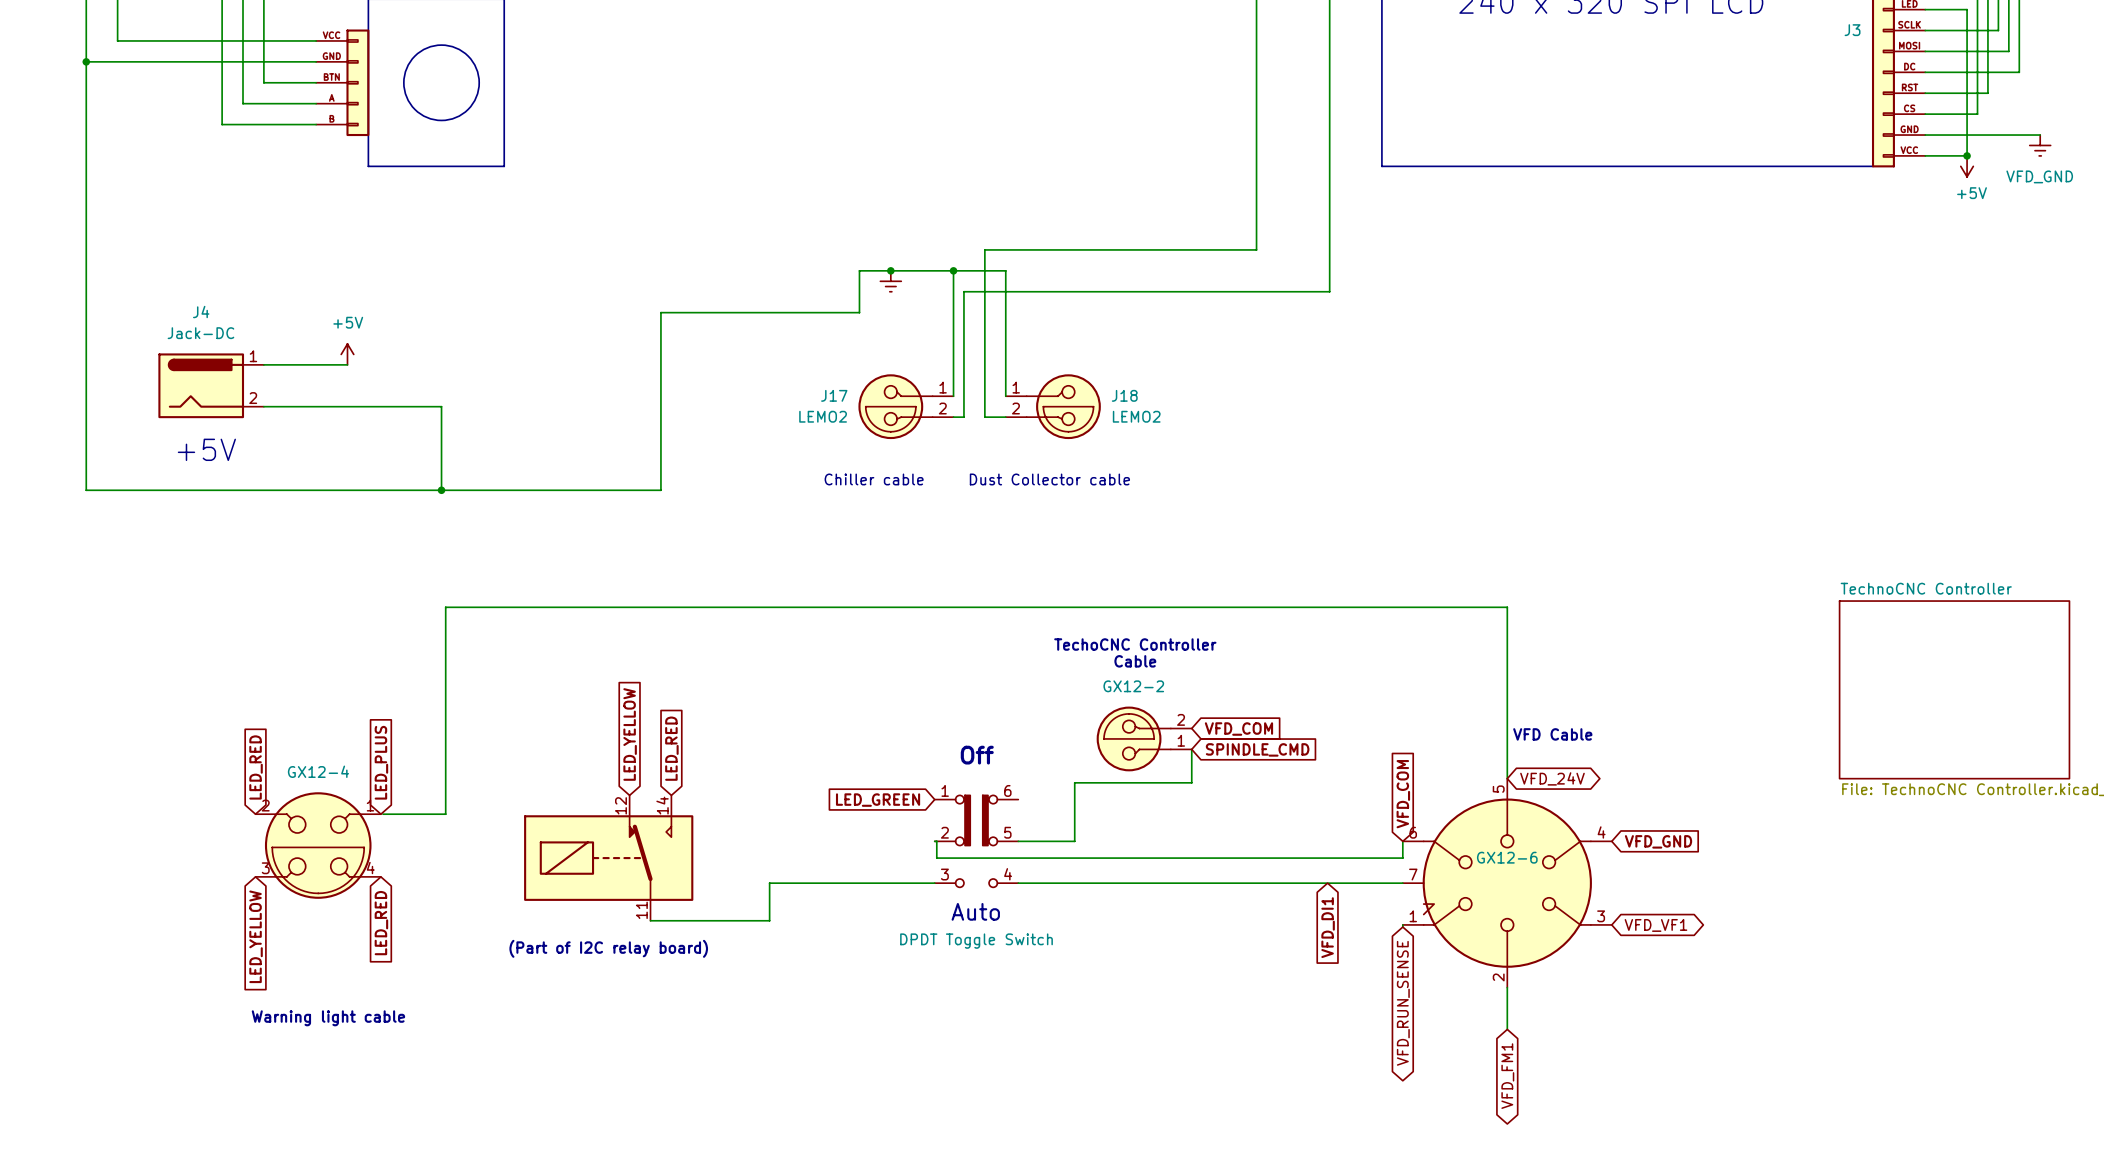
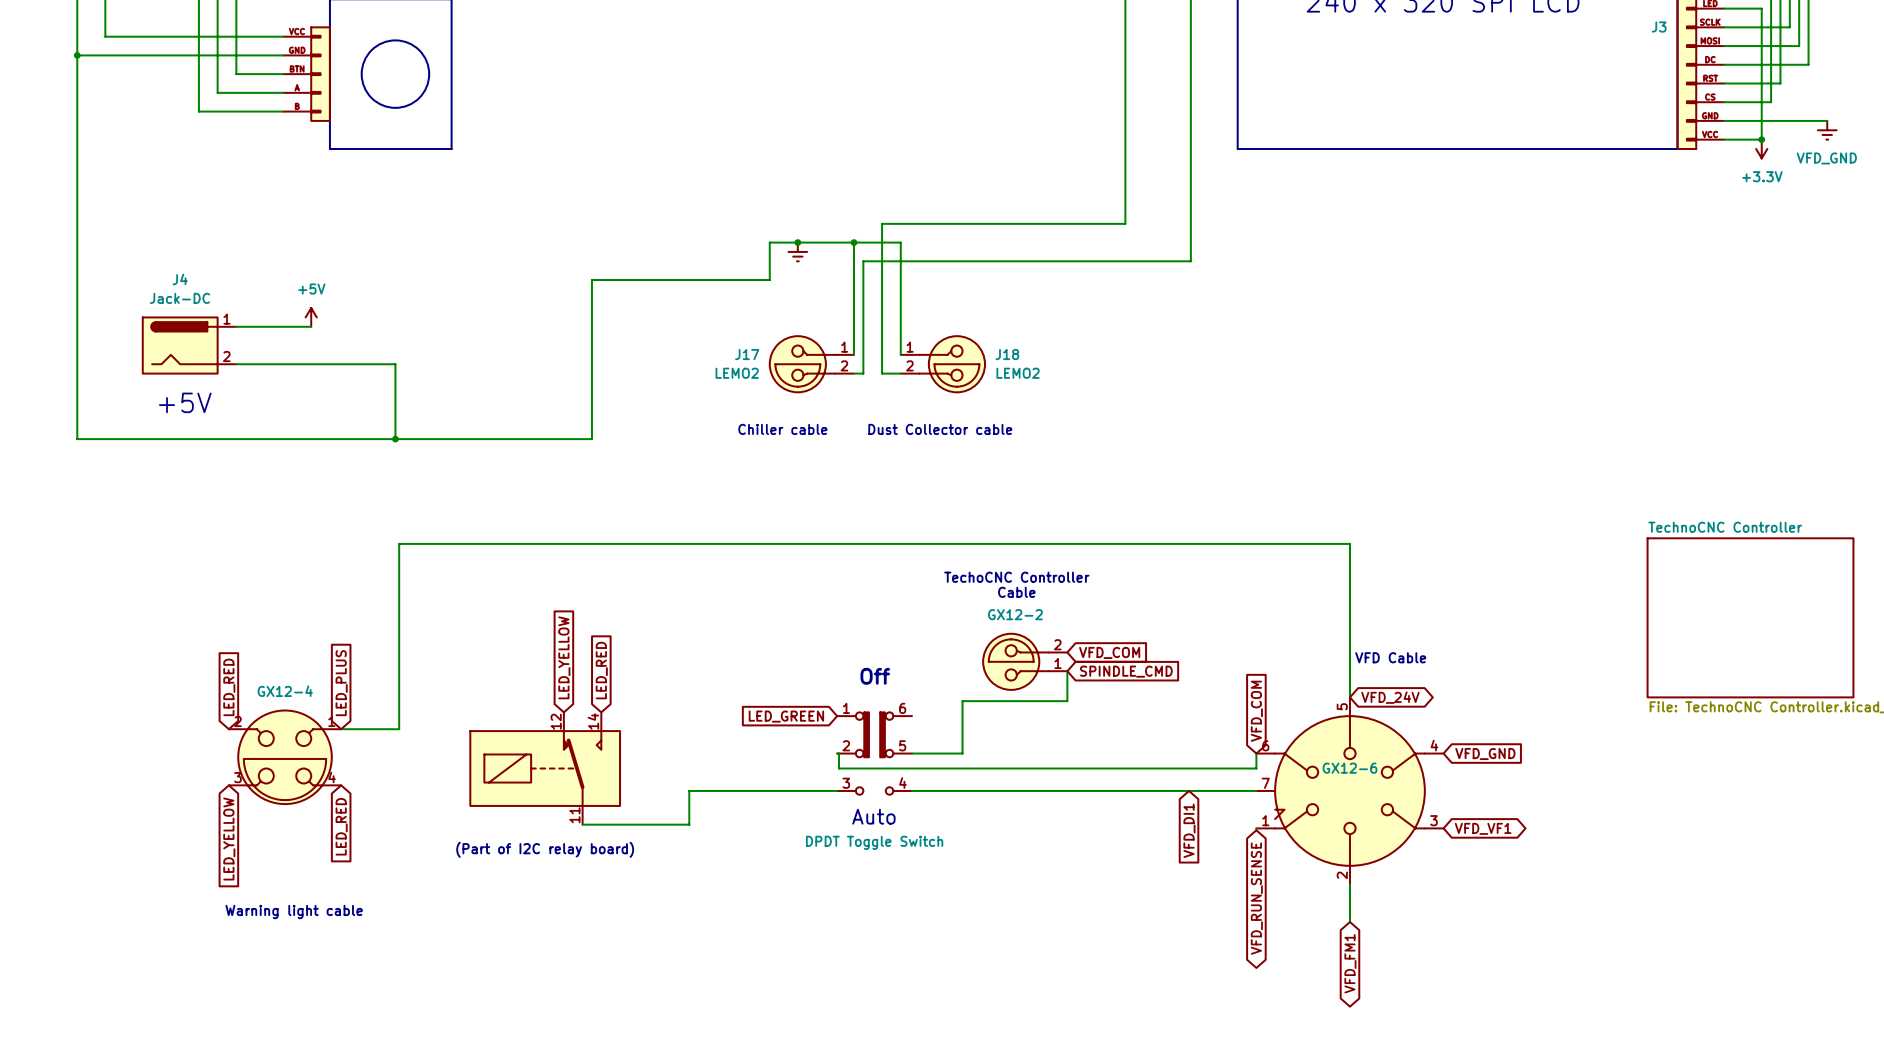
power symbol: +5V (1967, 166) -> +3.3V (1761, 149)

